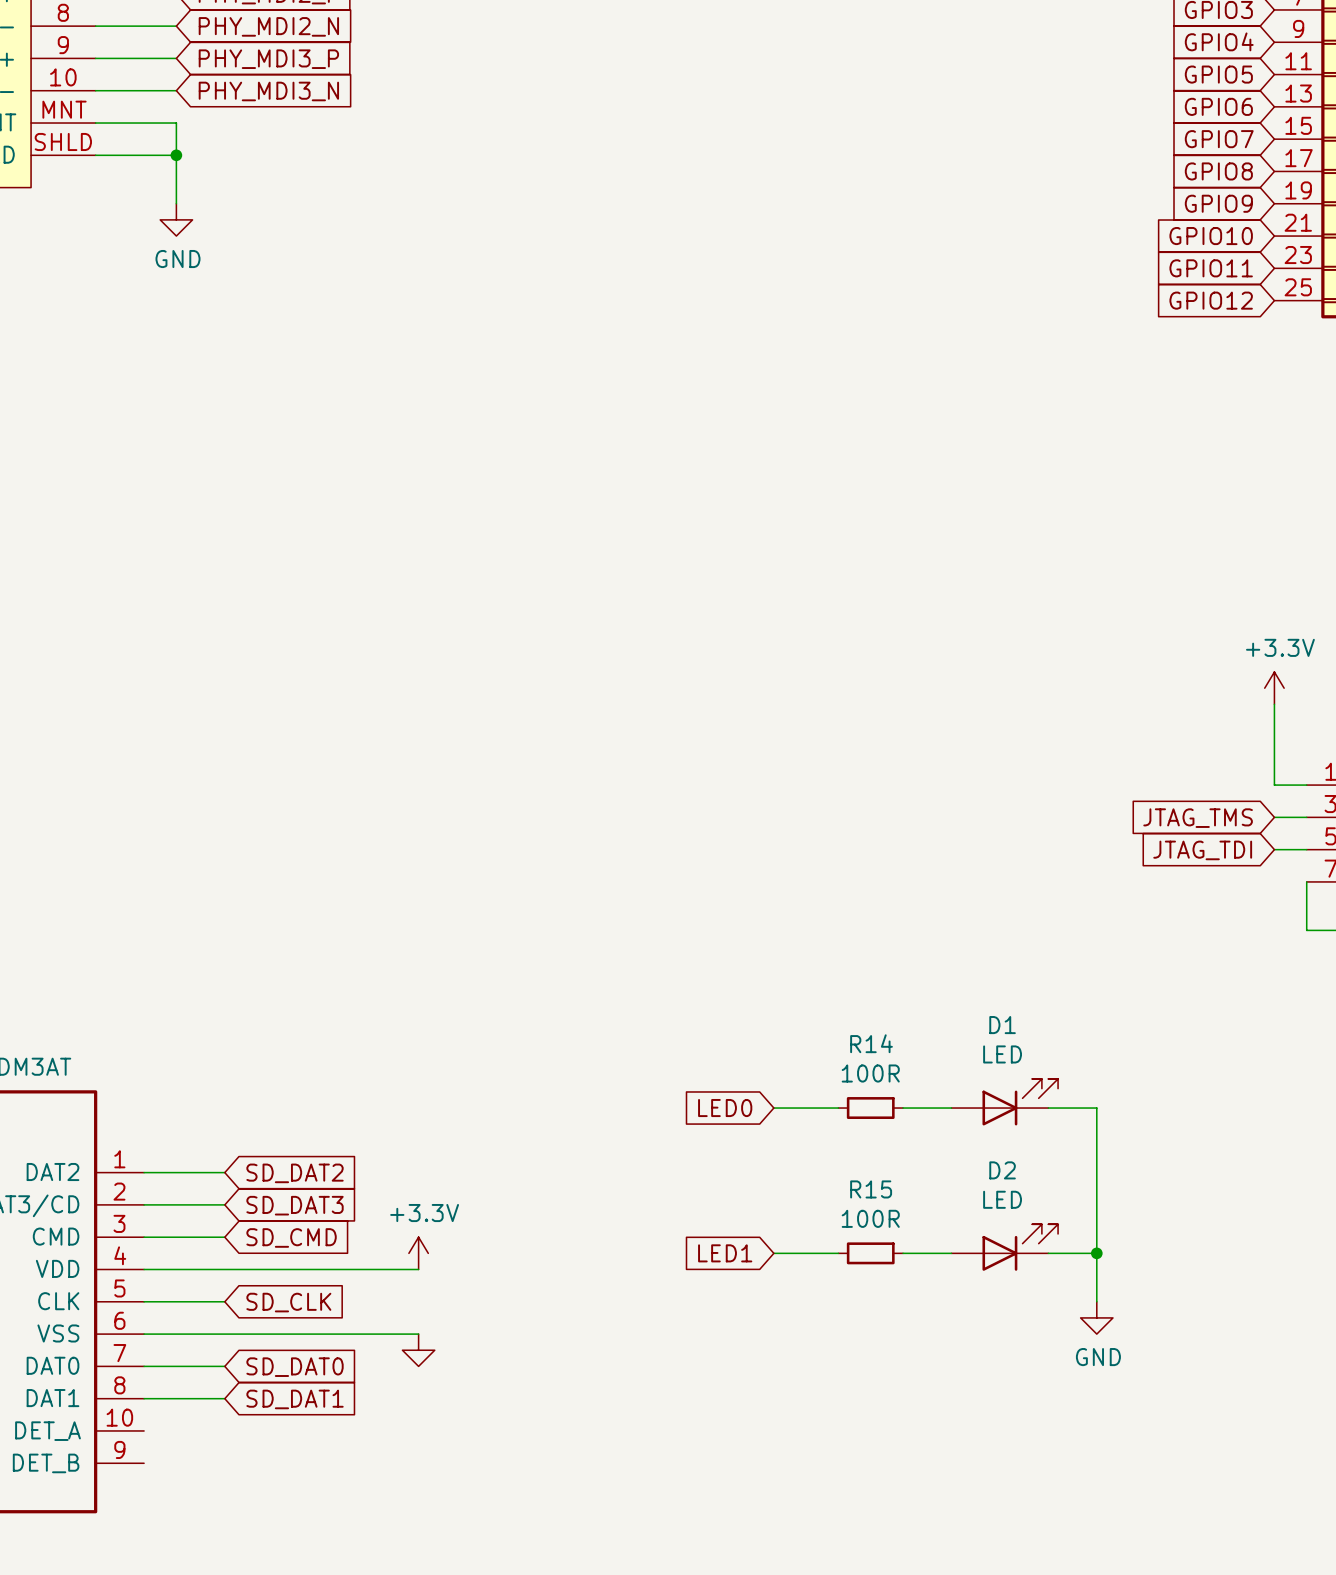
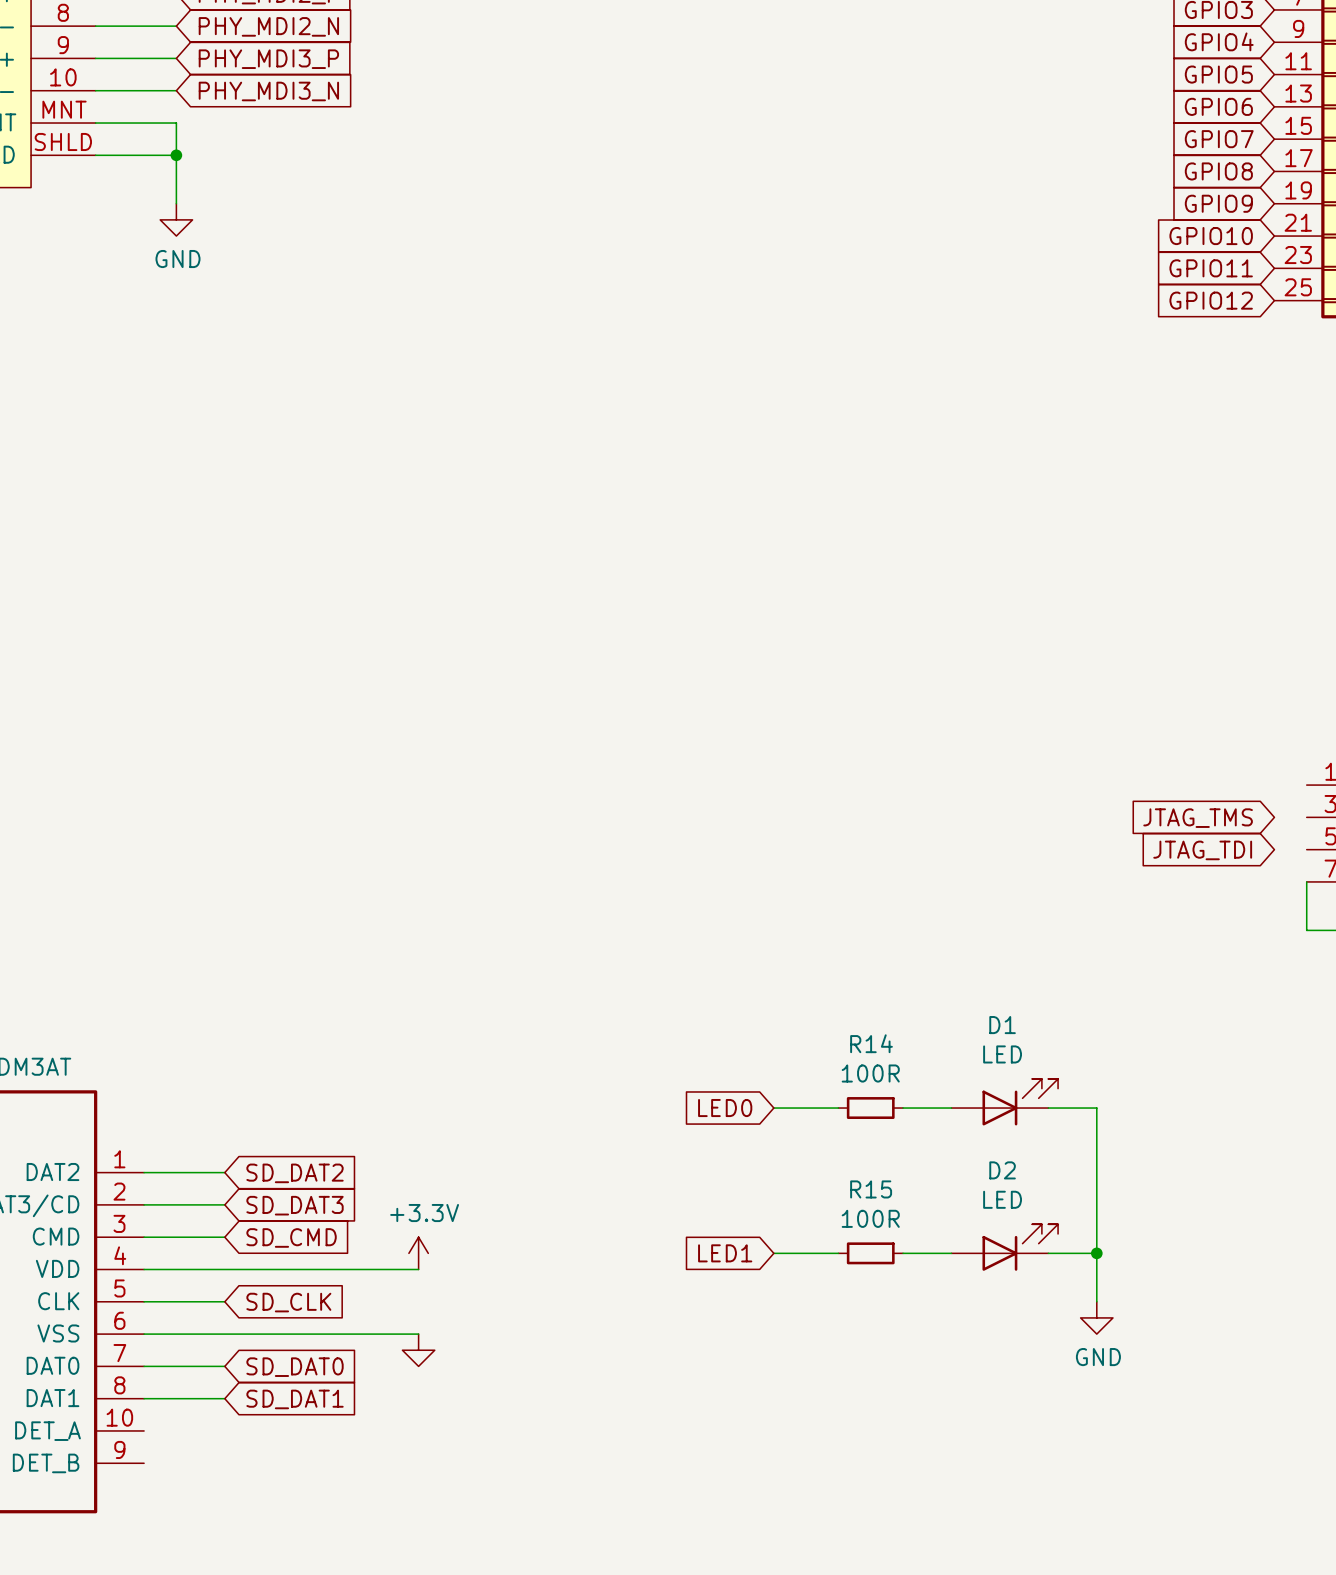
power symbol: +3.3V (1274, 688) -> none
wire: (1274, 704) (1274, 785) (1306, 785) -> none
wire: (1274, 817) (1306, 817) -> none
wire: (1274, 849) (1306, 849) -> none

